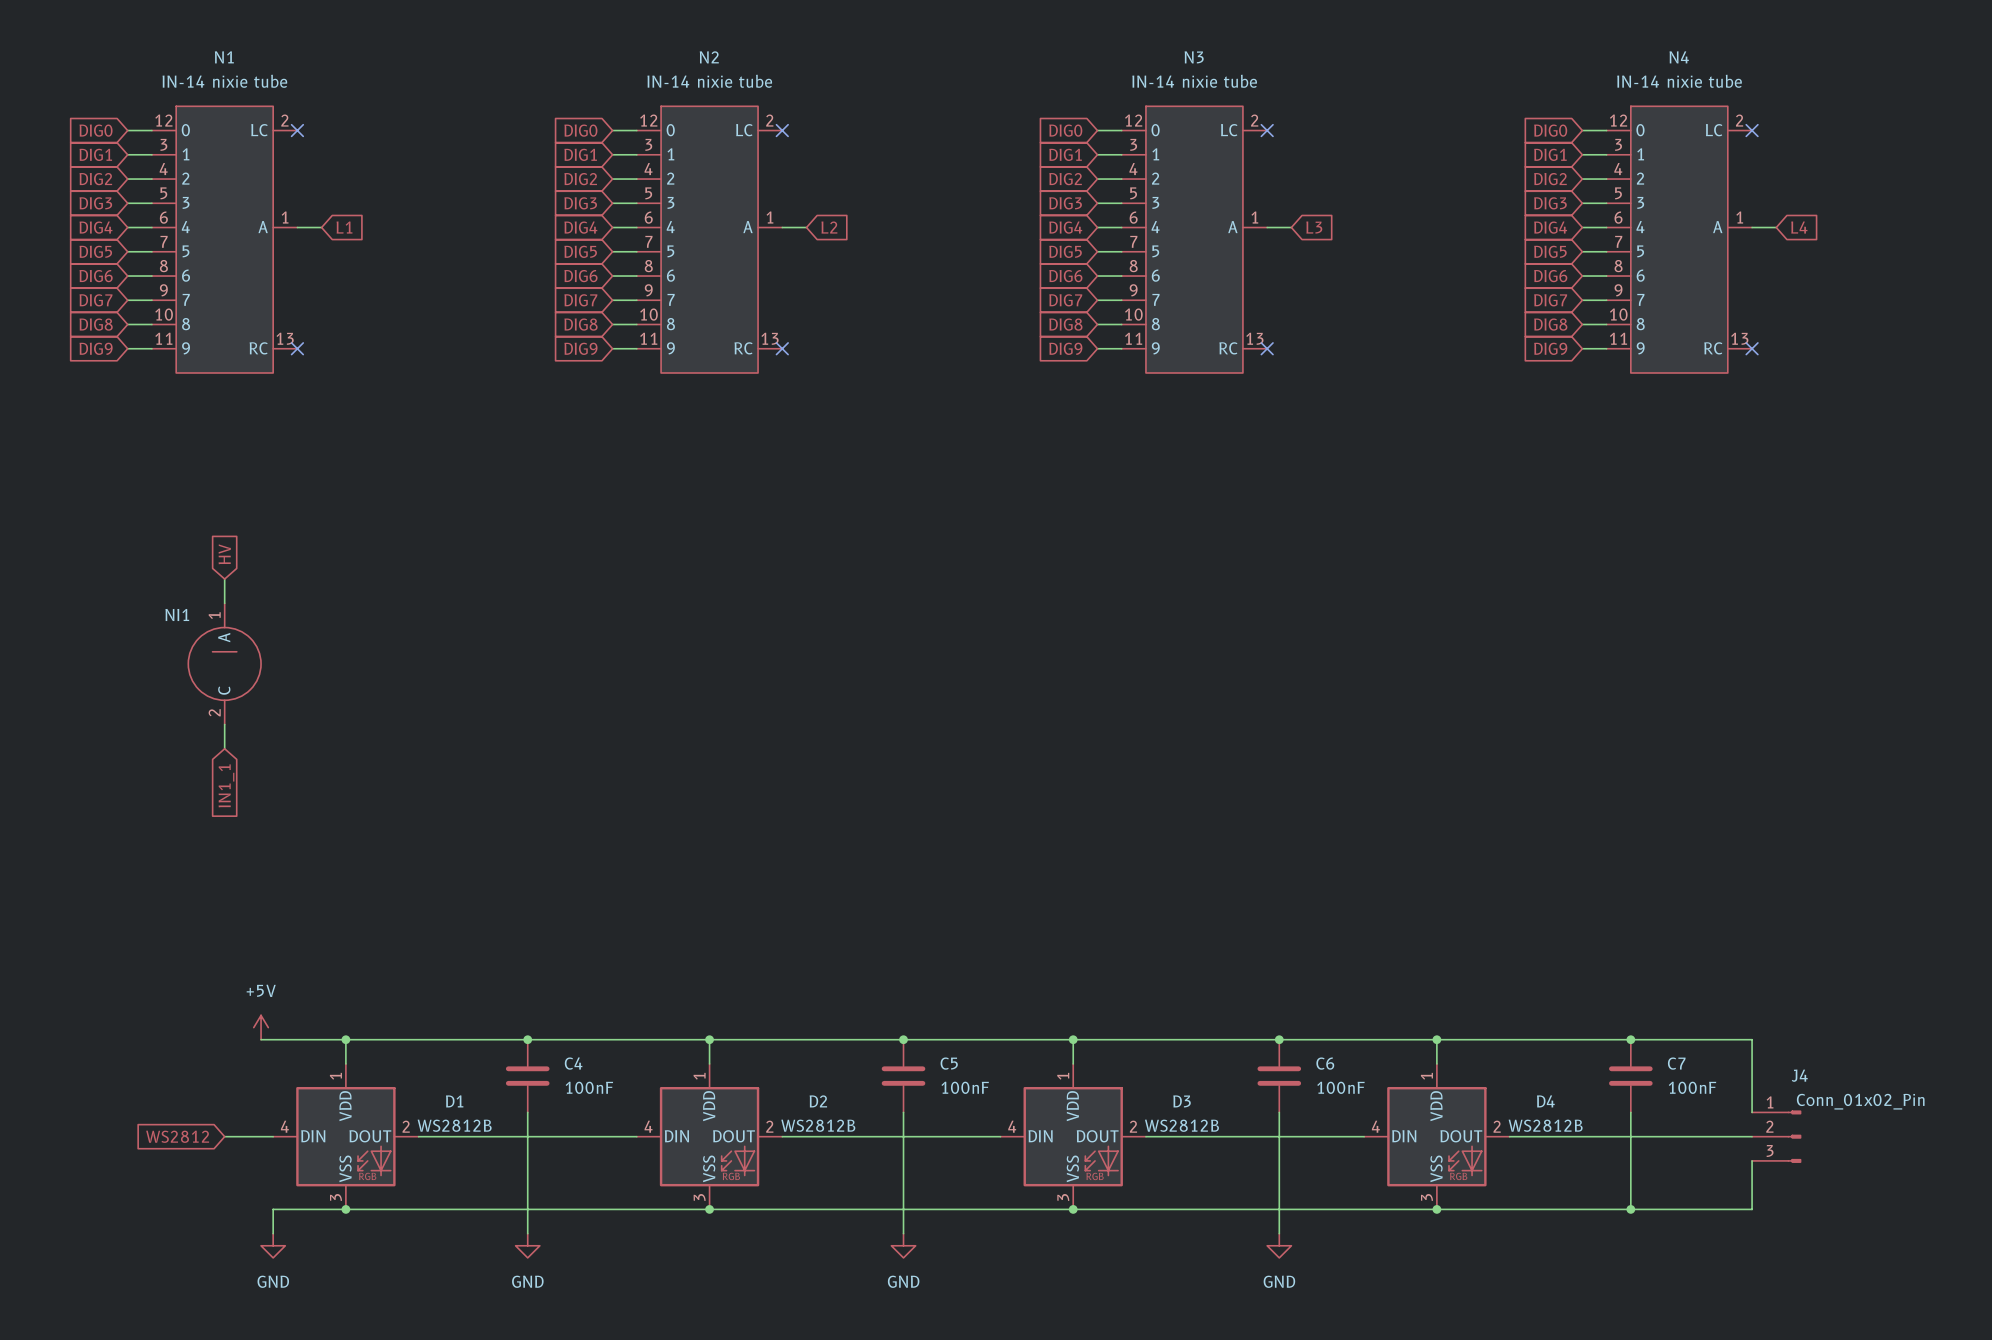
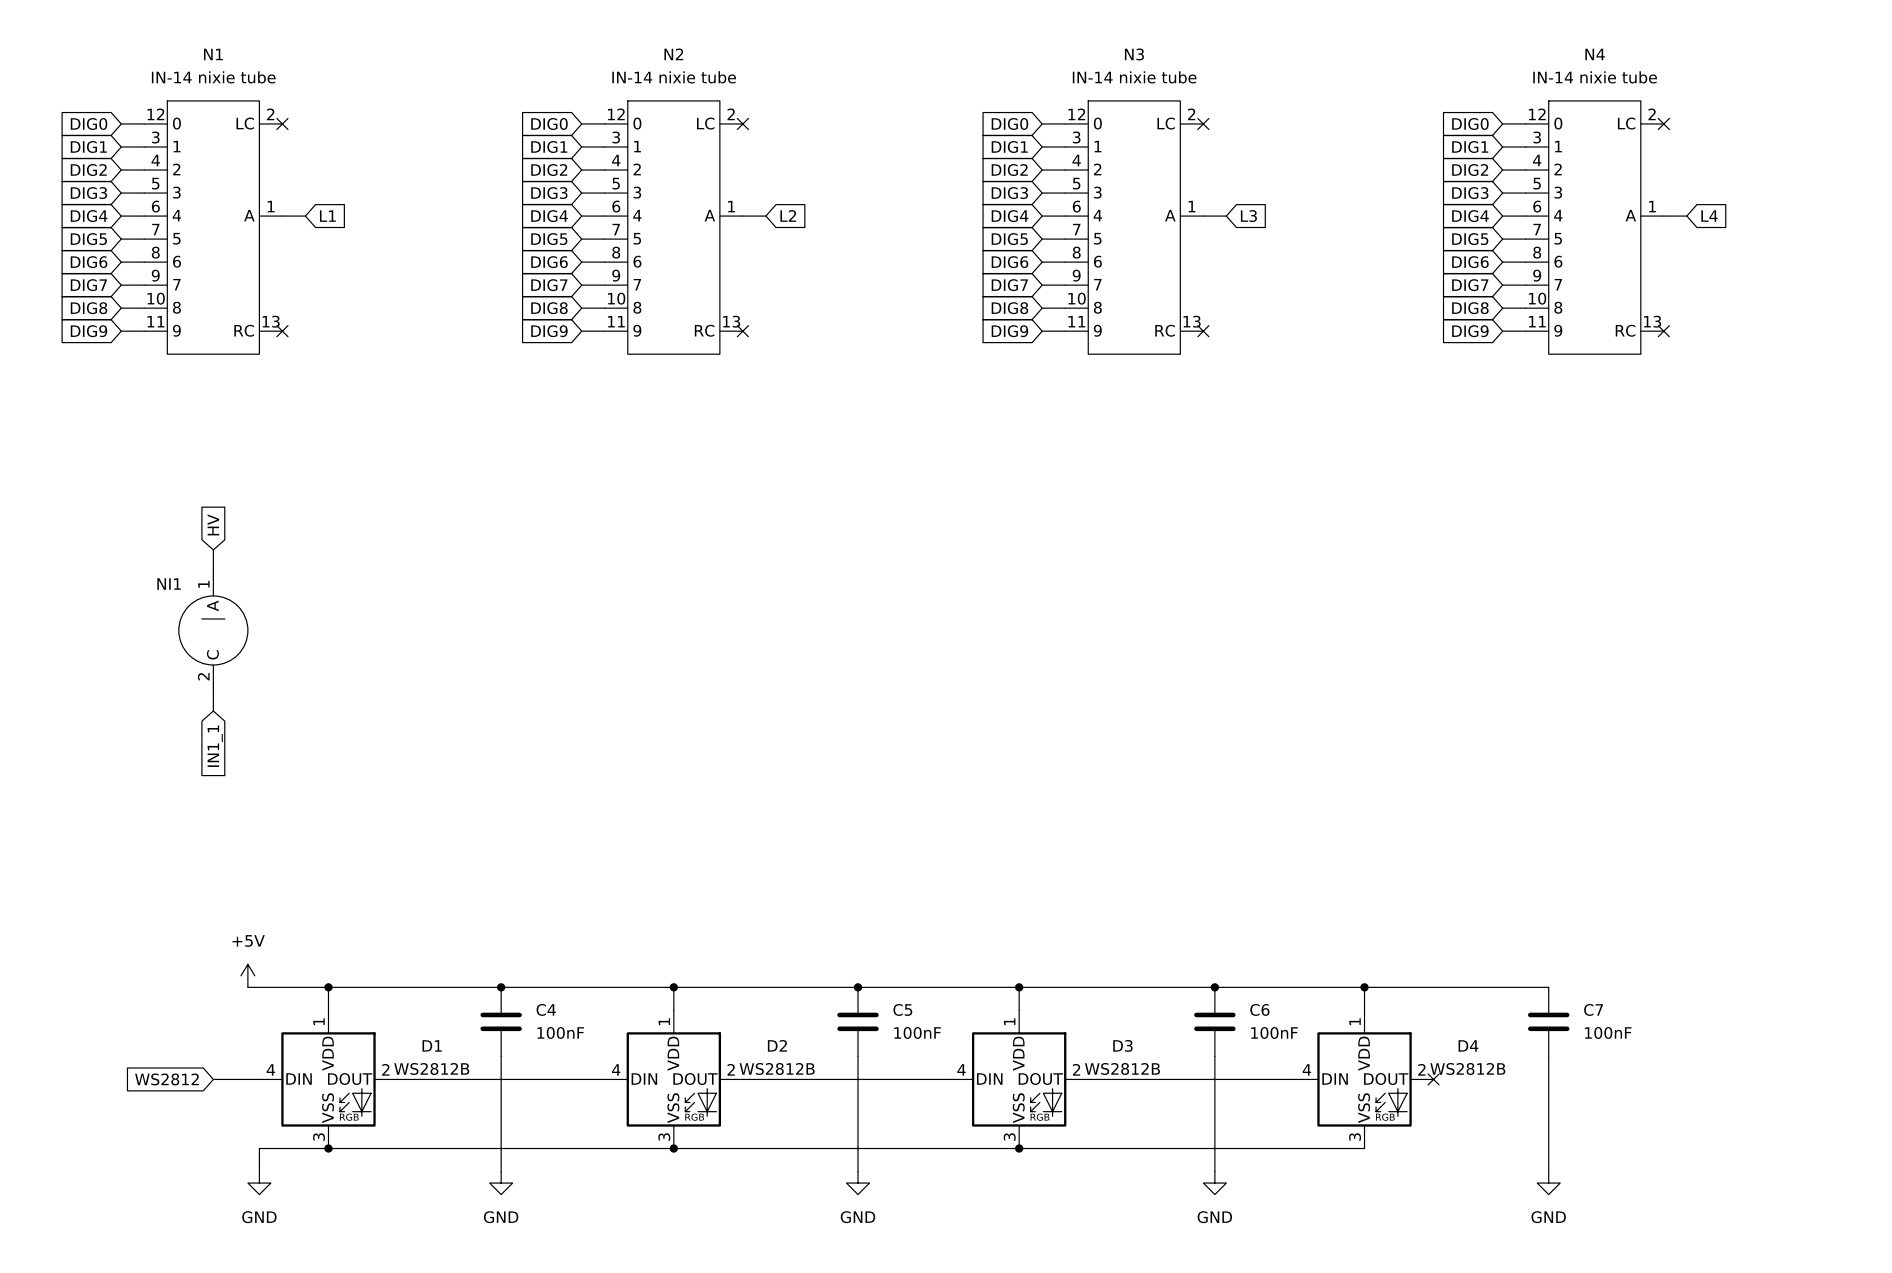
wire: (1630, 1039) (1752, 1039) (1752, 1112) -> none
junction: (1630, 1039) -> none
wire: (1509, 1136) (1752, 1136) -> none
no-connect mark: none -> (1433, 1079)
J4: Conn_01x02_Pin (1776, 1136) -> none
wire: (1752, 1160) (1752, 1209) (1436, 1209) -> none
junction: (1436, 1209) -> none
wire: none -> (1548, 1148) (1548, 1171)
junction: (1630, 1209) -> none
power symbol: none -> GND (1548, 1183)

